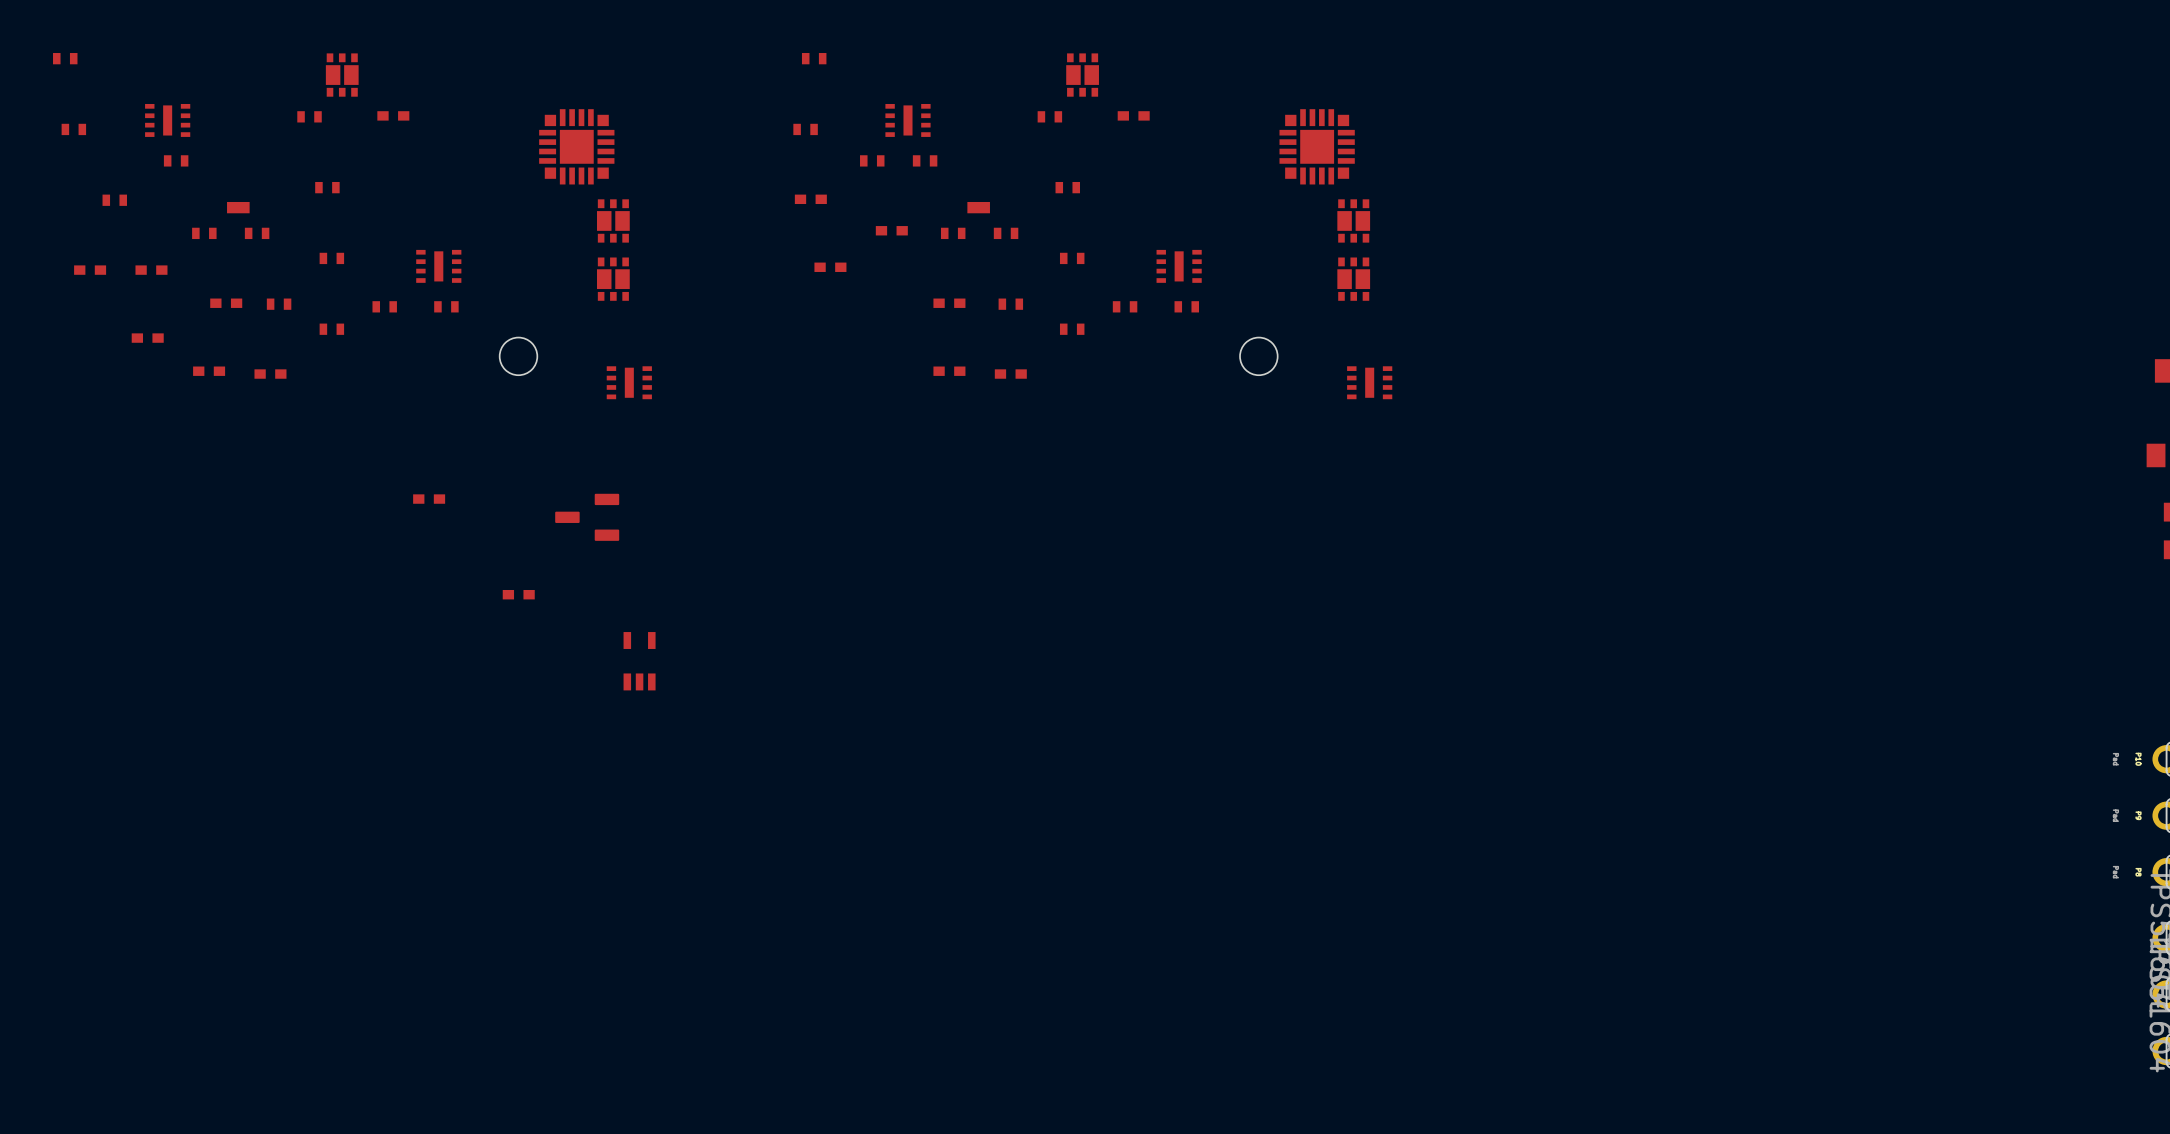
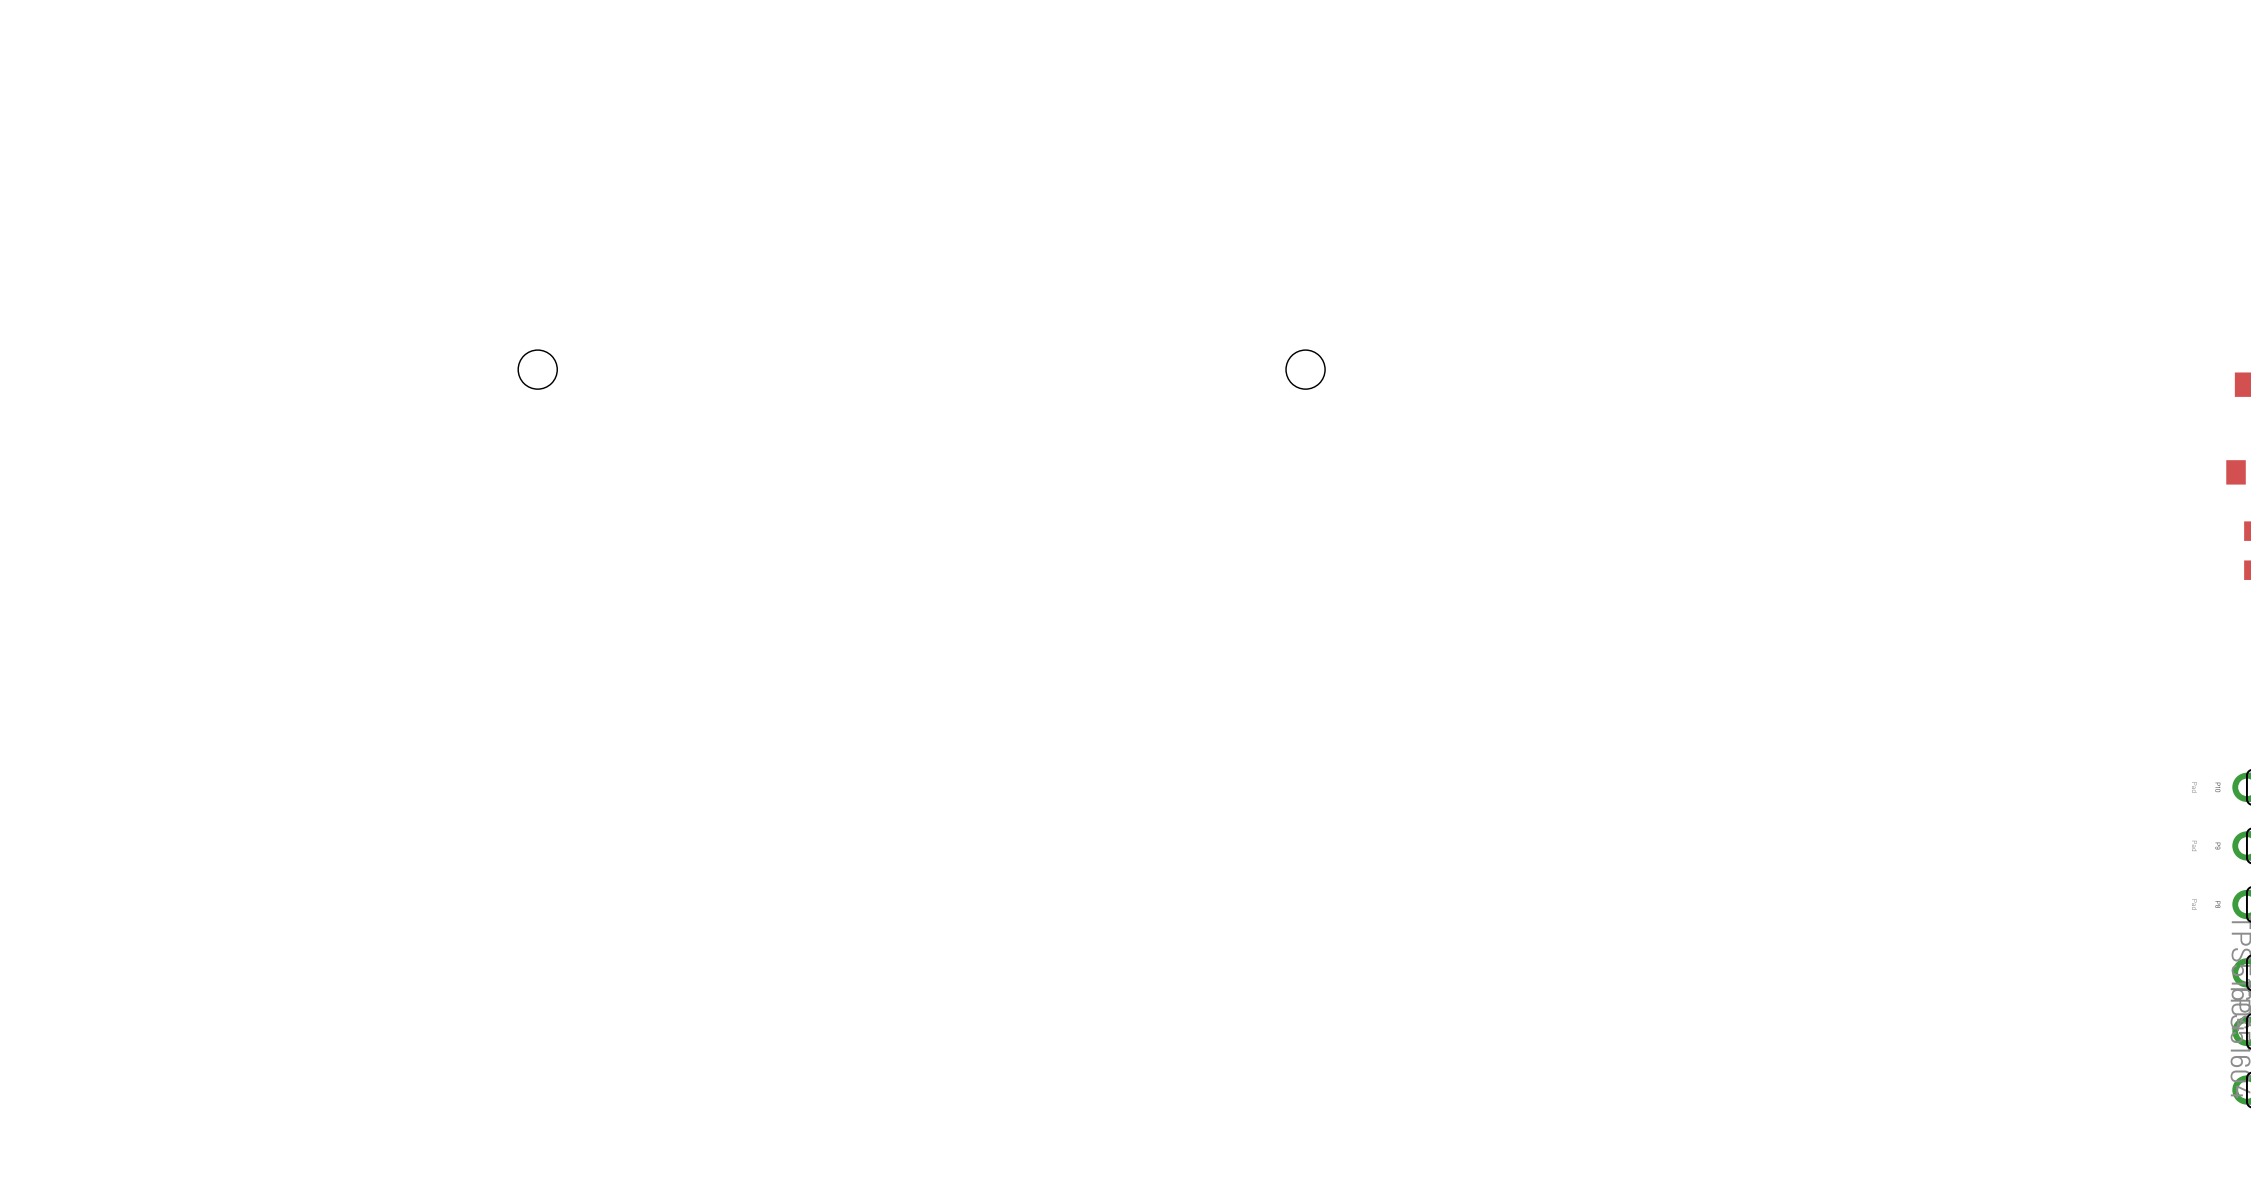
part: (65, 58) -> none
part: (814, 58) -> none
part: (342, 75) -> none
part: (1082, 75) -> none
part: (393, 115) -> none
part: (1133, 115) -> none
part: (309, 116) -> none
part: (1049, 116) -> none
part: (167, 120) -> none
part: (908, 120) -> none
part: (73, 129) -> none
part: (805, 129) -> none
part: (576, 146) -> none
part: (1317, 146) -> none
part: (176, 160) -> none
part: (872, 160) -> none
part: (925, 160) -> none
part: (327, 187) -> none
part: (1067, 187) -> none
part: (810, 199) -> none
part: (114, 200) -> none
part: (238, 207) -> none
part: (978, 207) -> none
part: (613, 220) -> none
part: (1353, 220) -> none
part: (891, 230) -> none
part: (204, 233) -> none
part: (257, 233) -> none
part: (953, 233) -> none
part: (1006, 233) -> none
part: (331, 258) -> none
part: (1072, 258) -> none
part: (438, 266) -> none
part: (1179, 266) -> none
part: (830, 267) -> none
part: (90, 270) -> none
part: (151, 270) -> none
part: (613, 279) -> none
part: (1353, 279) -> none
part: (226, 303) -> none
part: (949, 303) -> none
part: (279, 304) -> none
part: (1010, 304) -> none
part: (384, 306) -> none
part: (446, 306) -> none
part: (1125, 306) -> none
part: (1186, 306) -> none
part: (331, 329) -> none
part: (1072, 329) -> none
part: (147, 338) -> none
part: (209, 371) -> none
part: (949, 371) -> none
part: (270, 374) -> none
part: (1010, 374) -> none
part: (629, 382) -> none
part: (1369, 382) -> none
part: (429, 499) -> none
part: (587, 517) -> none
part: (518, 594) -> none
part: (639, 661) -> none

